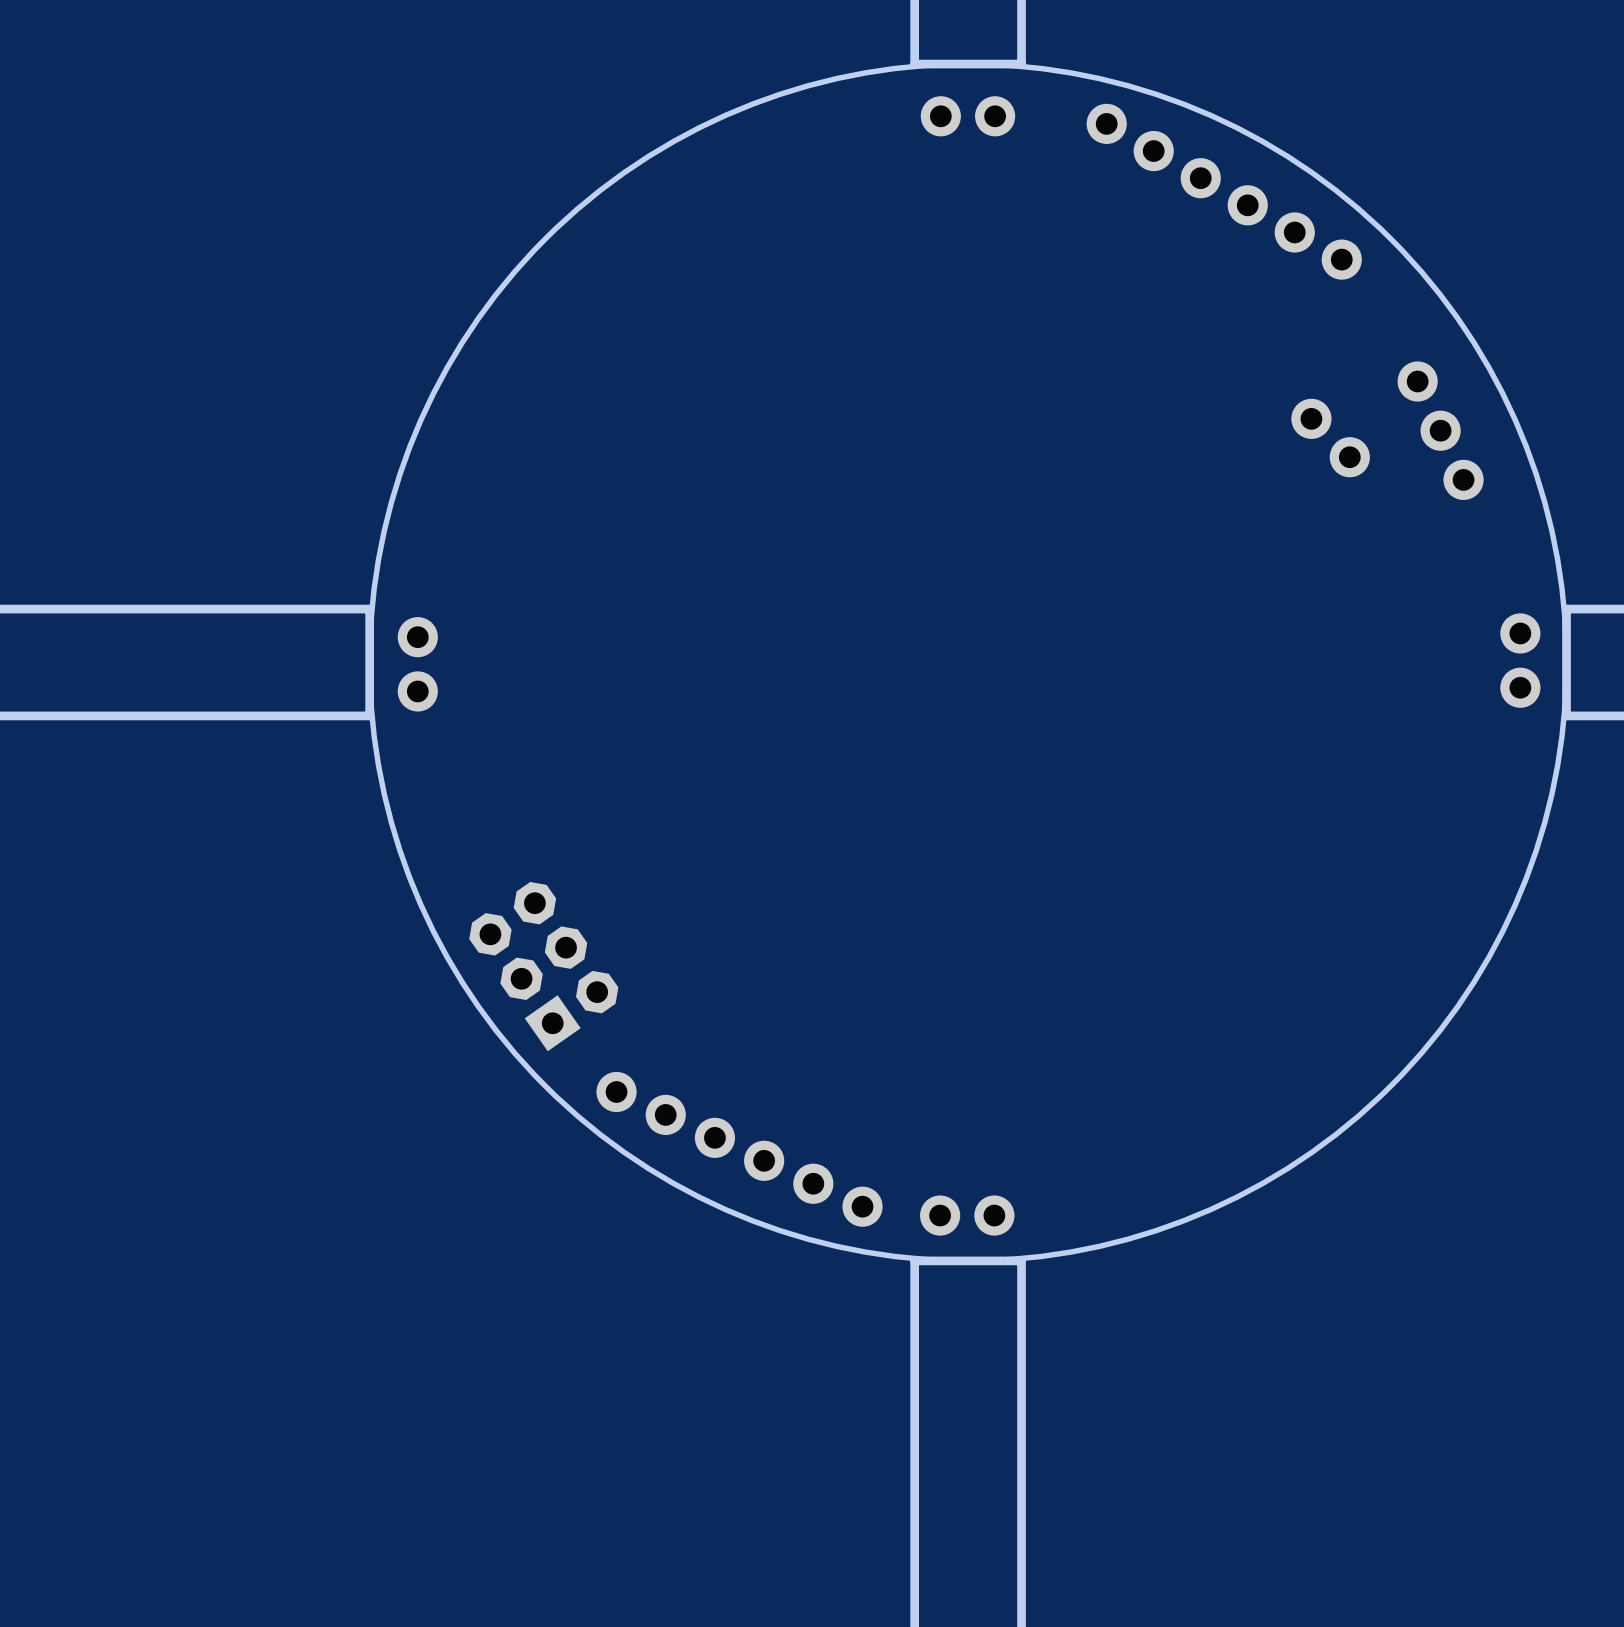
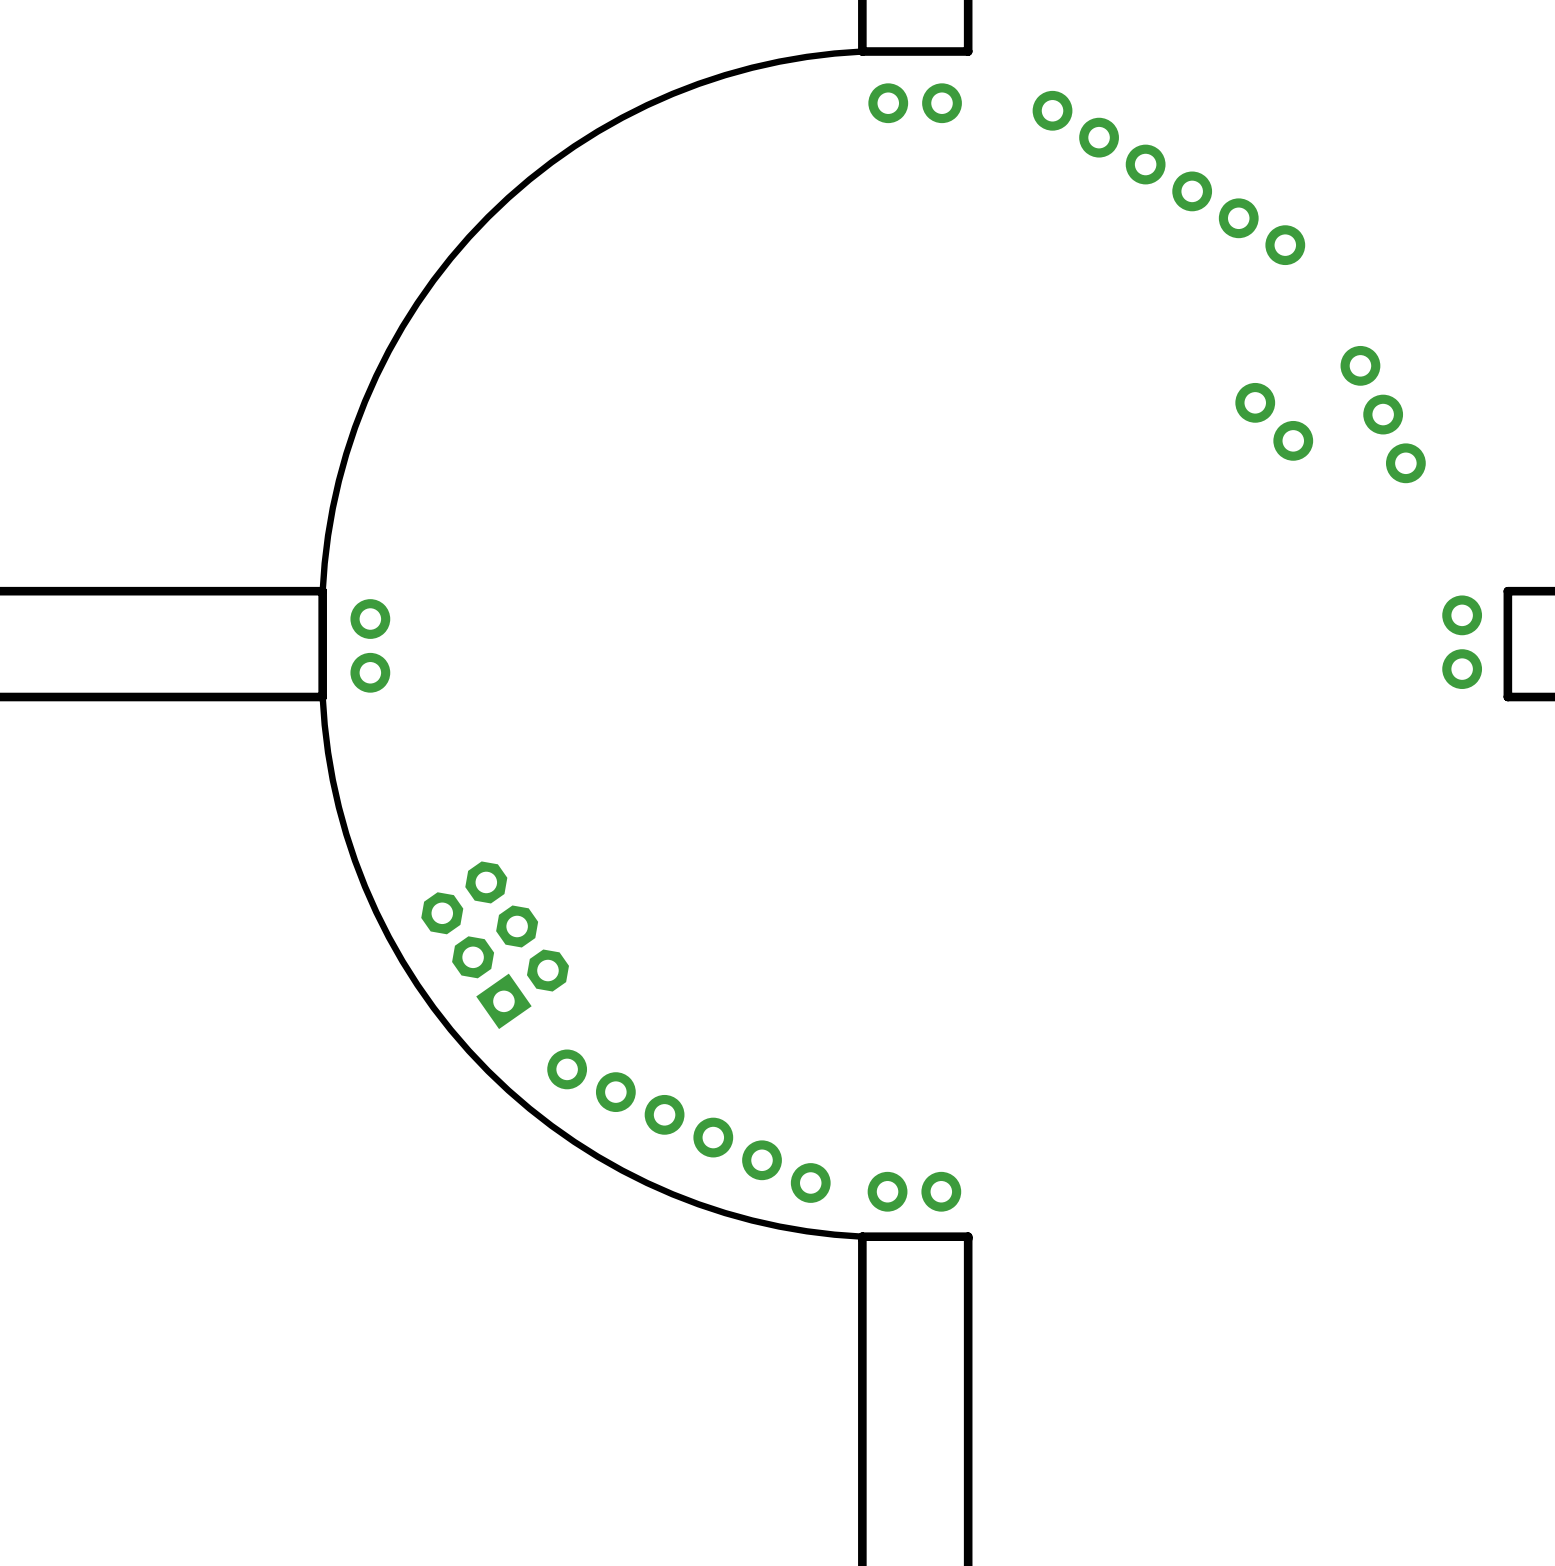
round board edge: [366, 61, 1570, 1264] -> none
board edge: none -> (862, 51) (806, 56) (752, 67) (698, 83) (647, 105) (597, 131) (551, 162) (488, 217) (433, 280) (402, 326) (376, 375) (355, 427) (338, 480) (328, 535) (322, 591)
board edge: none -> (322, 697) (328, 752) (338, 807) (355, 860) (376, 912) (402, 961) (433, 1007) (488, 1071) (551, 1125) (597, 1156) (647, 1183) (698, 1204) (752, 1220) (806, 1231) (862, 1236)

